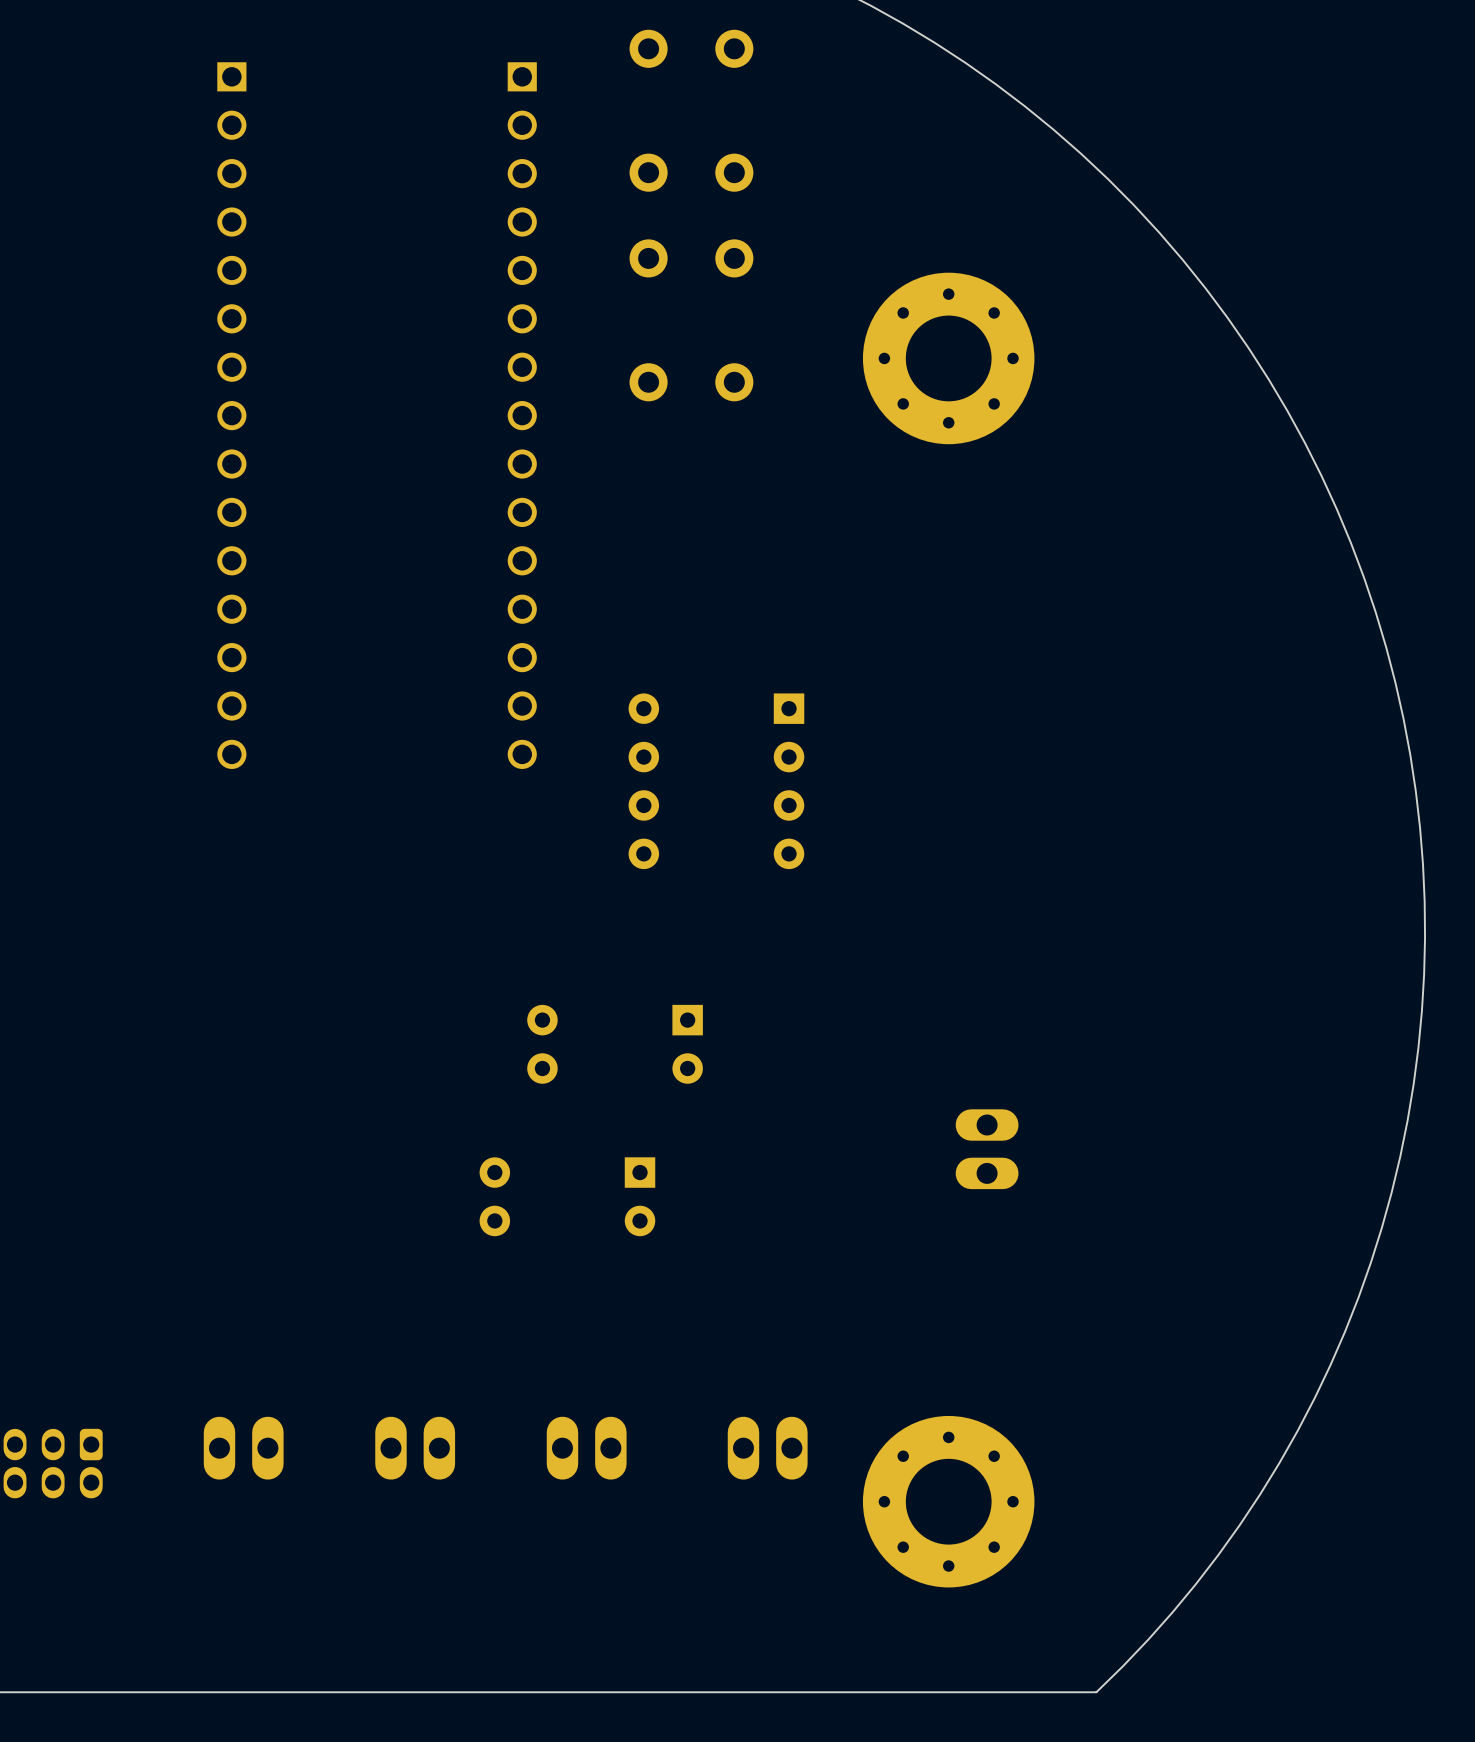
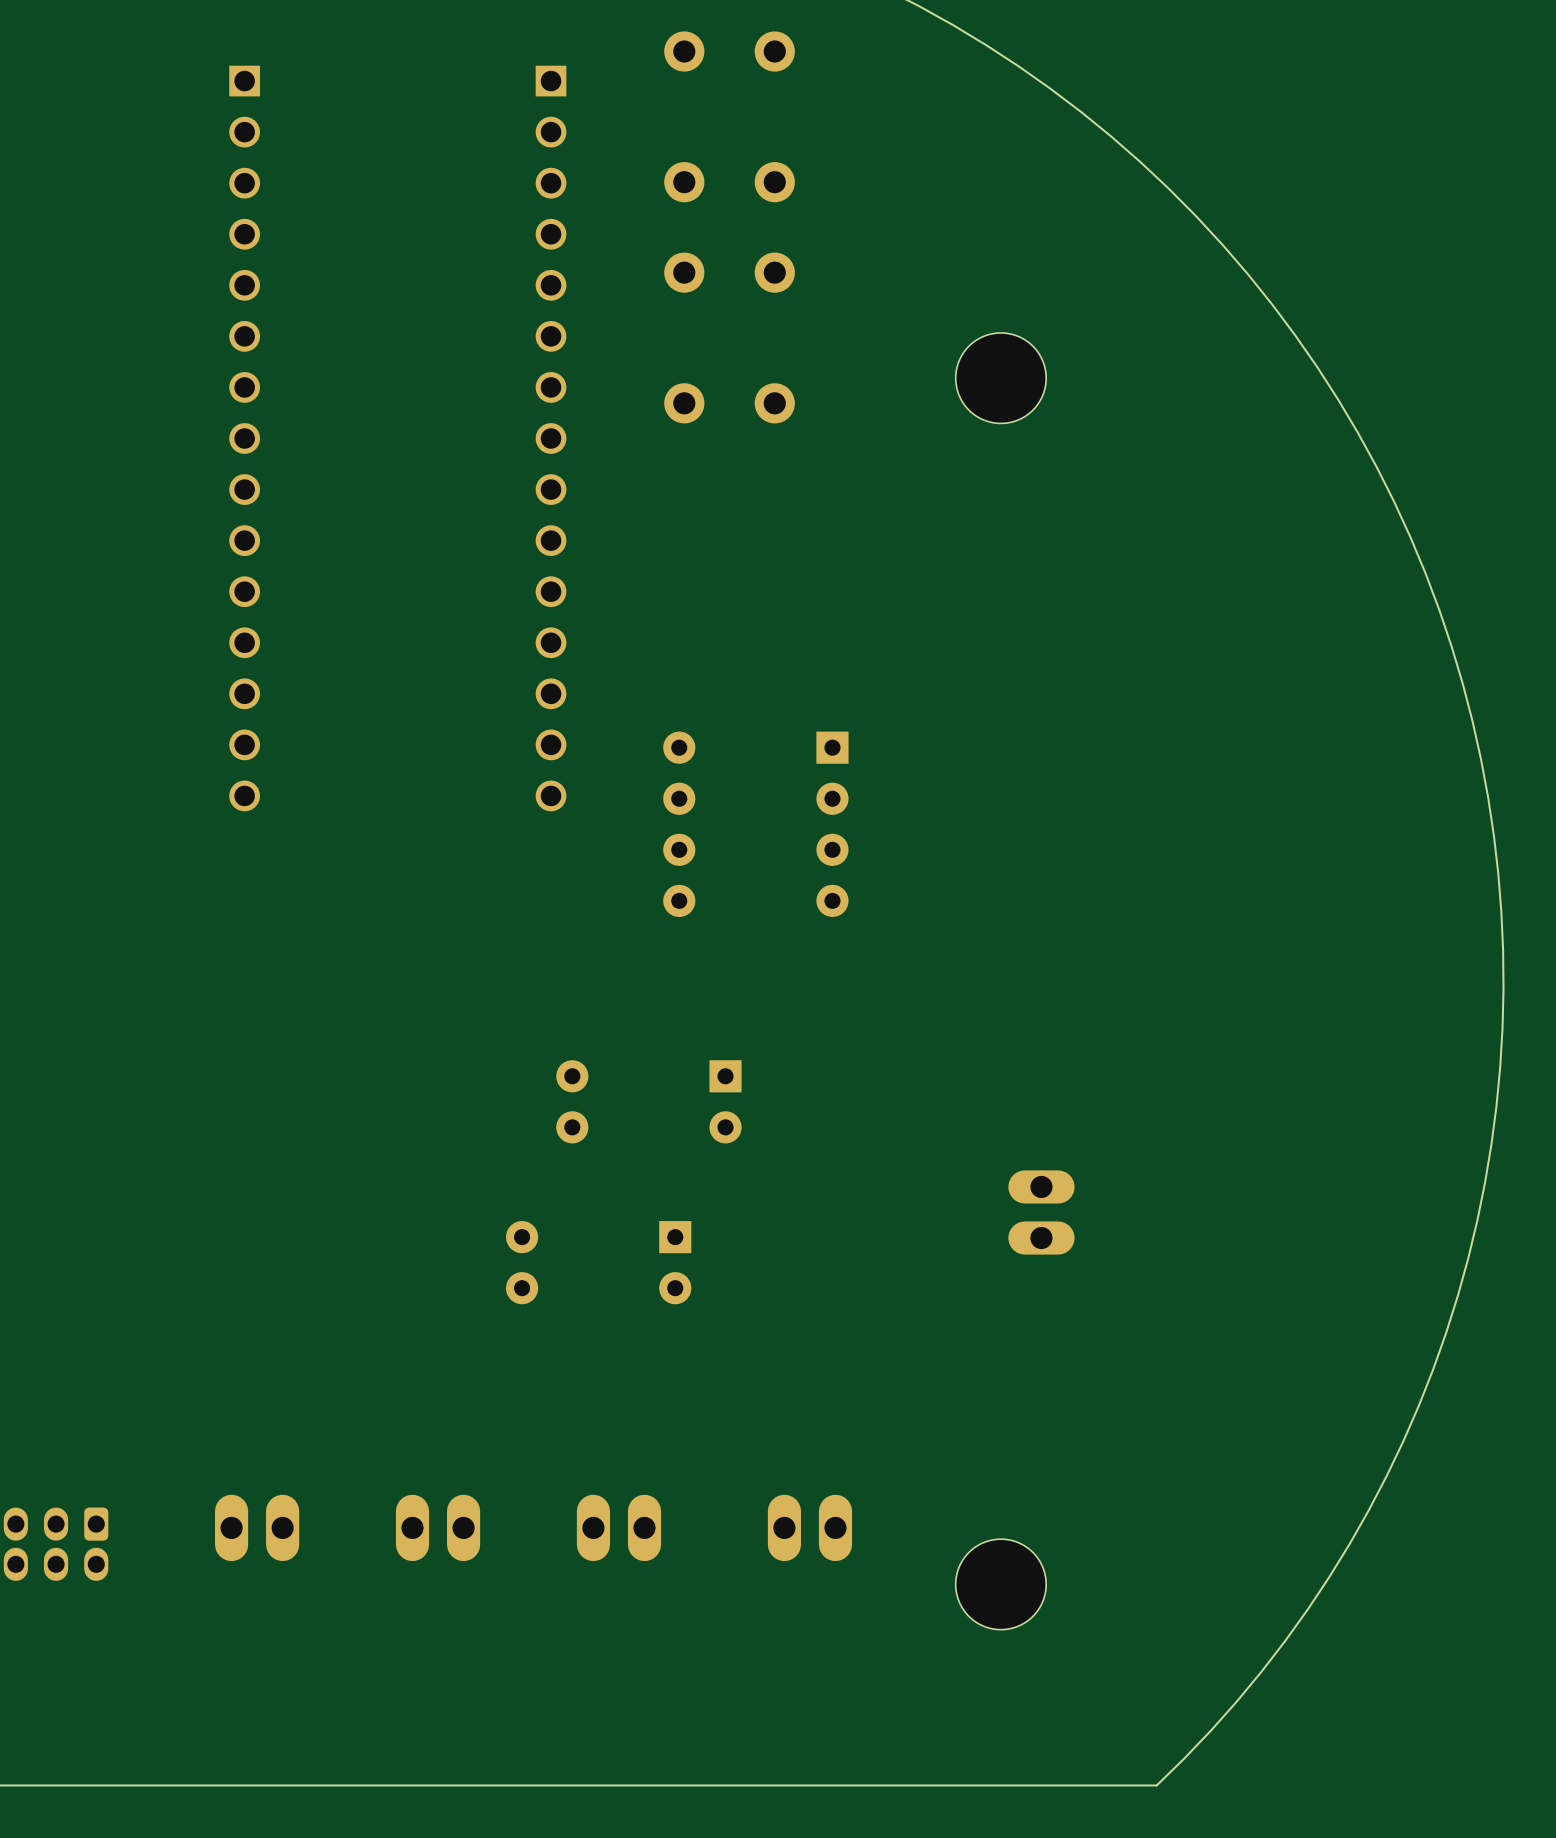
part footprint: [862, 272, 1035, 445] -> [955, 332, 1047, 424]
part footprint: [862, 1415, 1035, 1588] -> [955, 1539, 1047, 1630]

